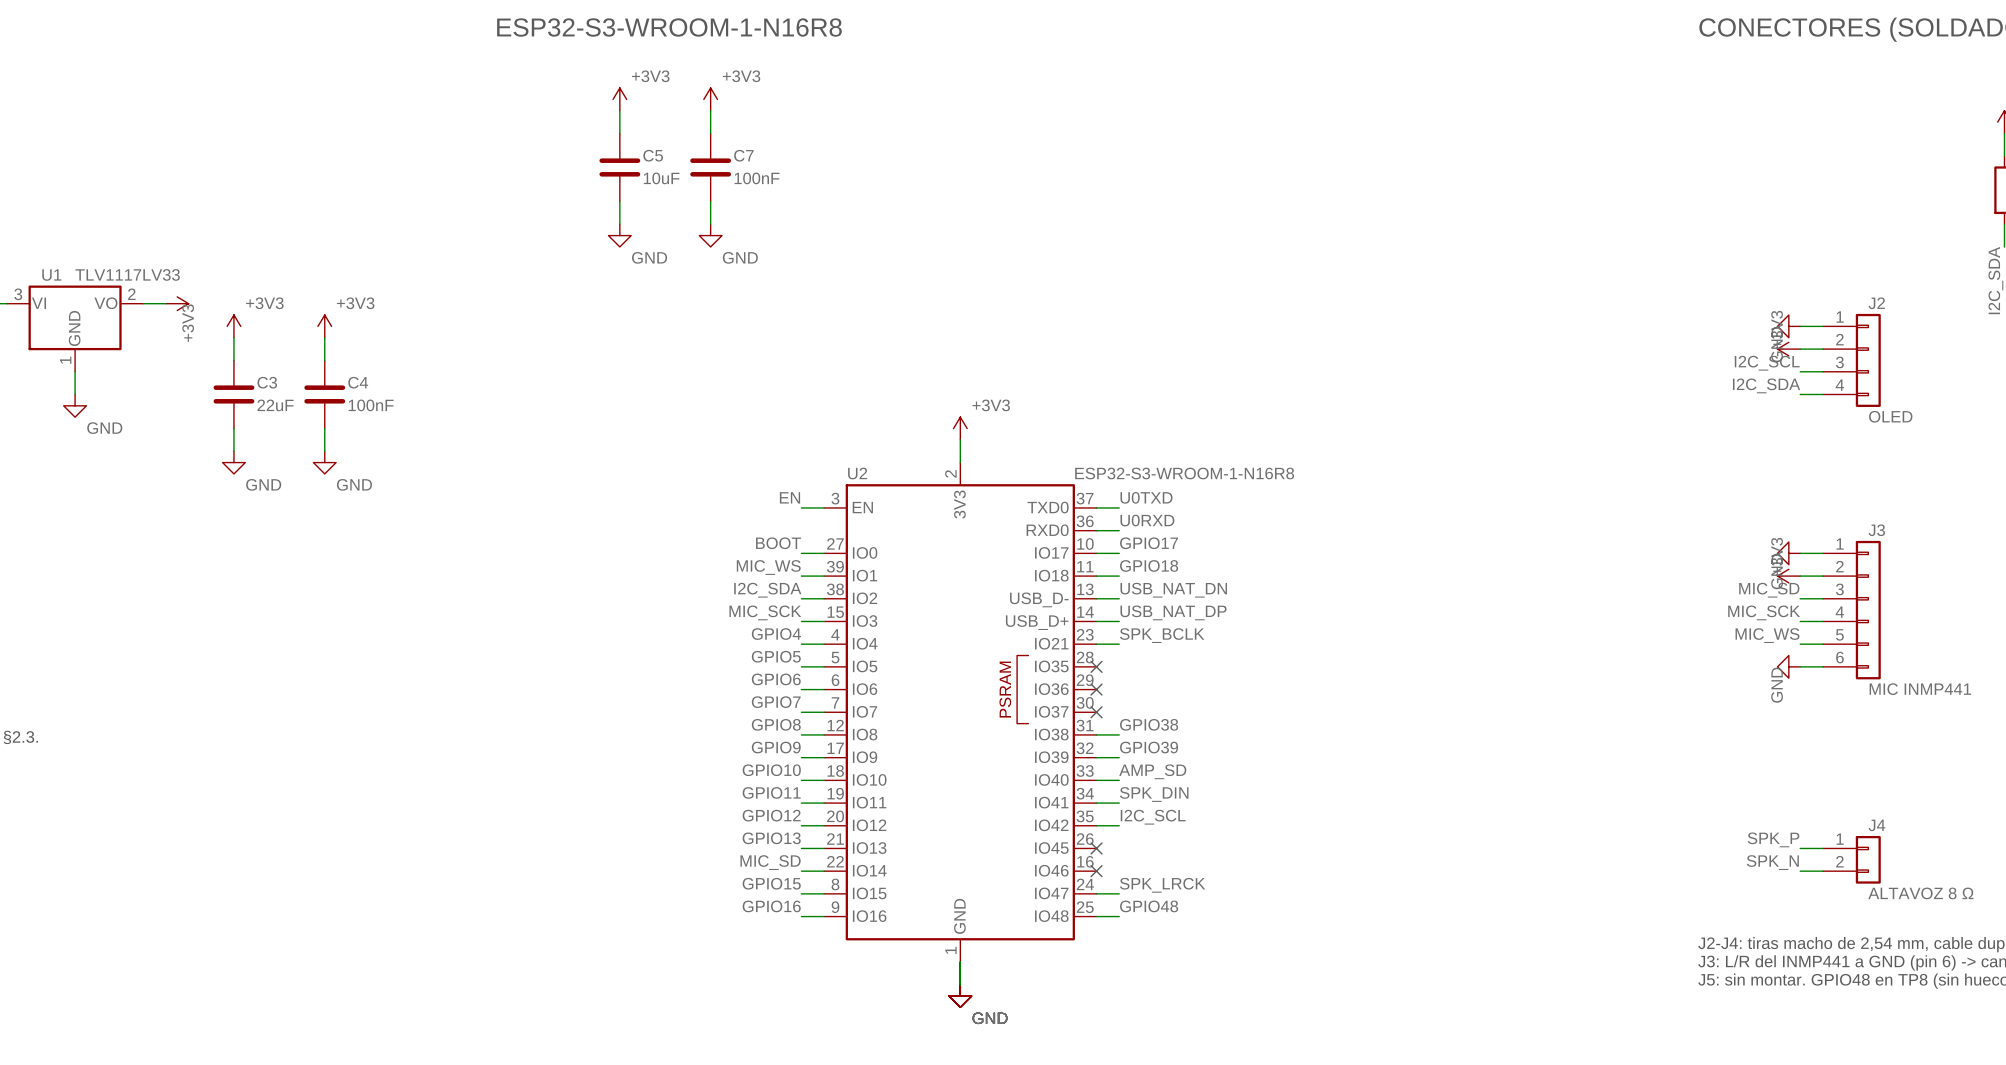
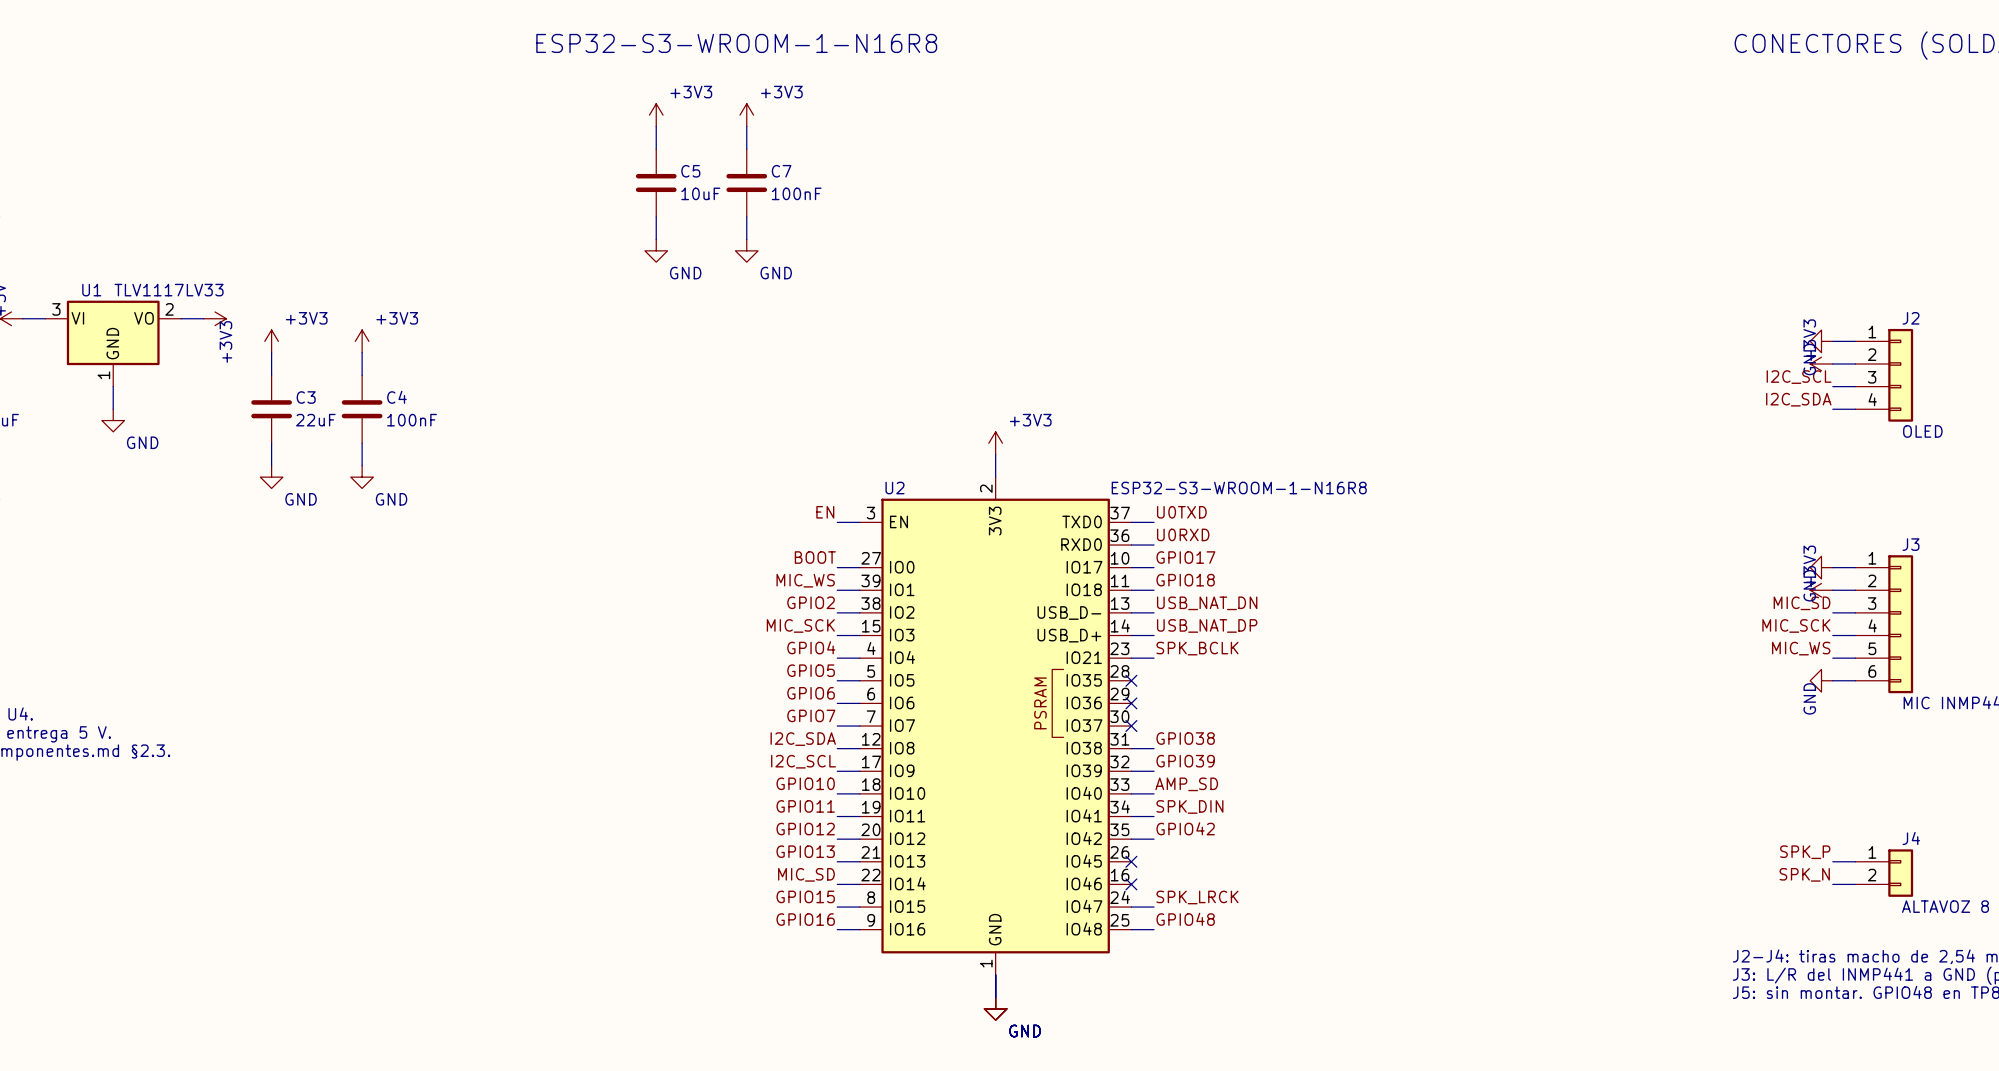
label: I2C_SDA (767, 590) -> GPIO2 (811, 602)
label: GPIO8 (776, 724) -> I2C_SDA (803, 739)
label: GPIO9 (776, 747) -> I2C_SCL (803, 761)
label: I2C_SCL (1153, 817) -> GPIO42 (1185, 828)

